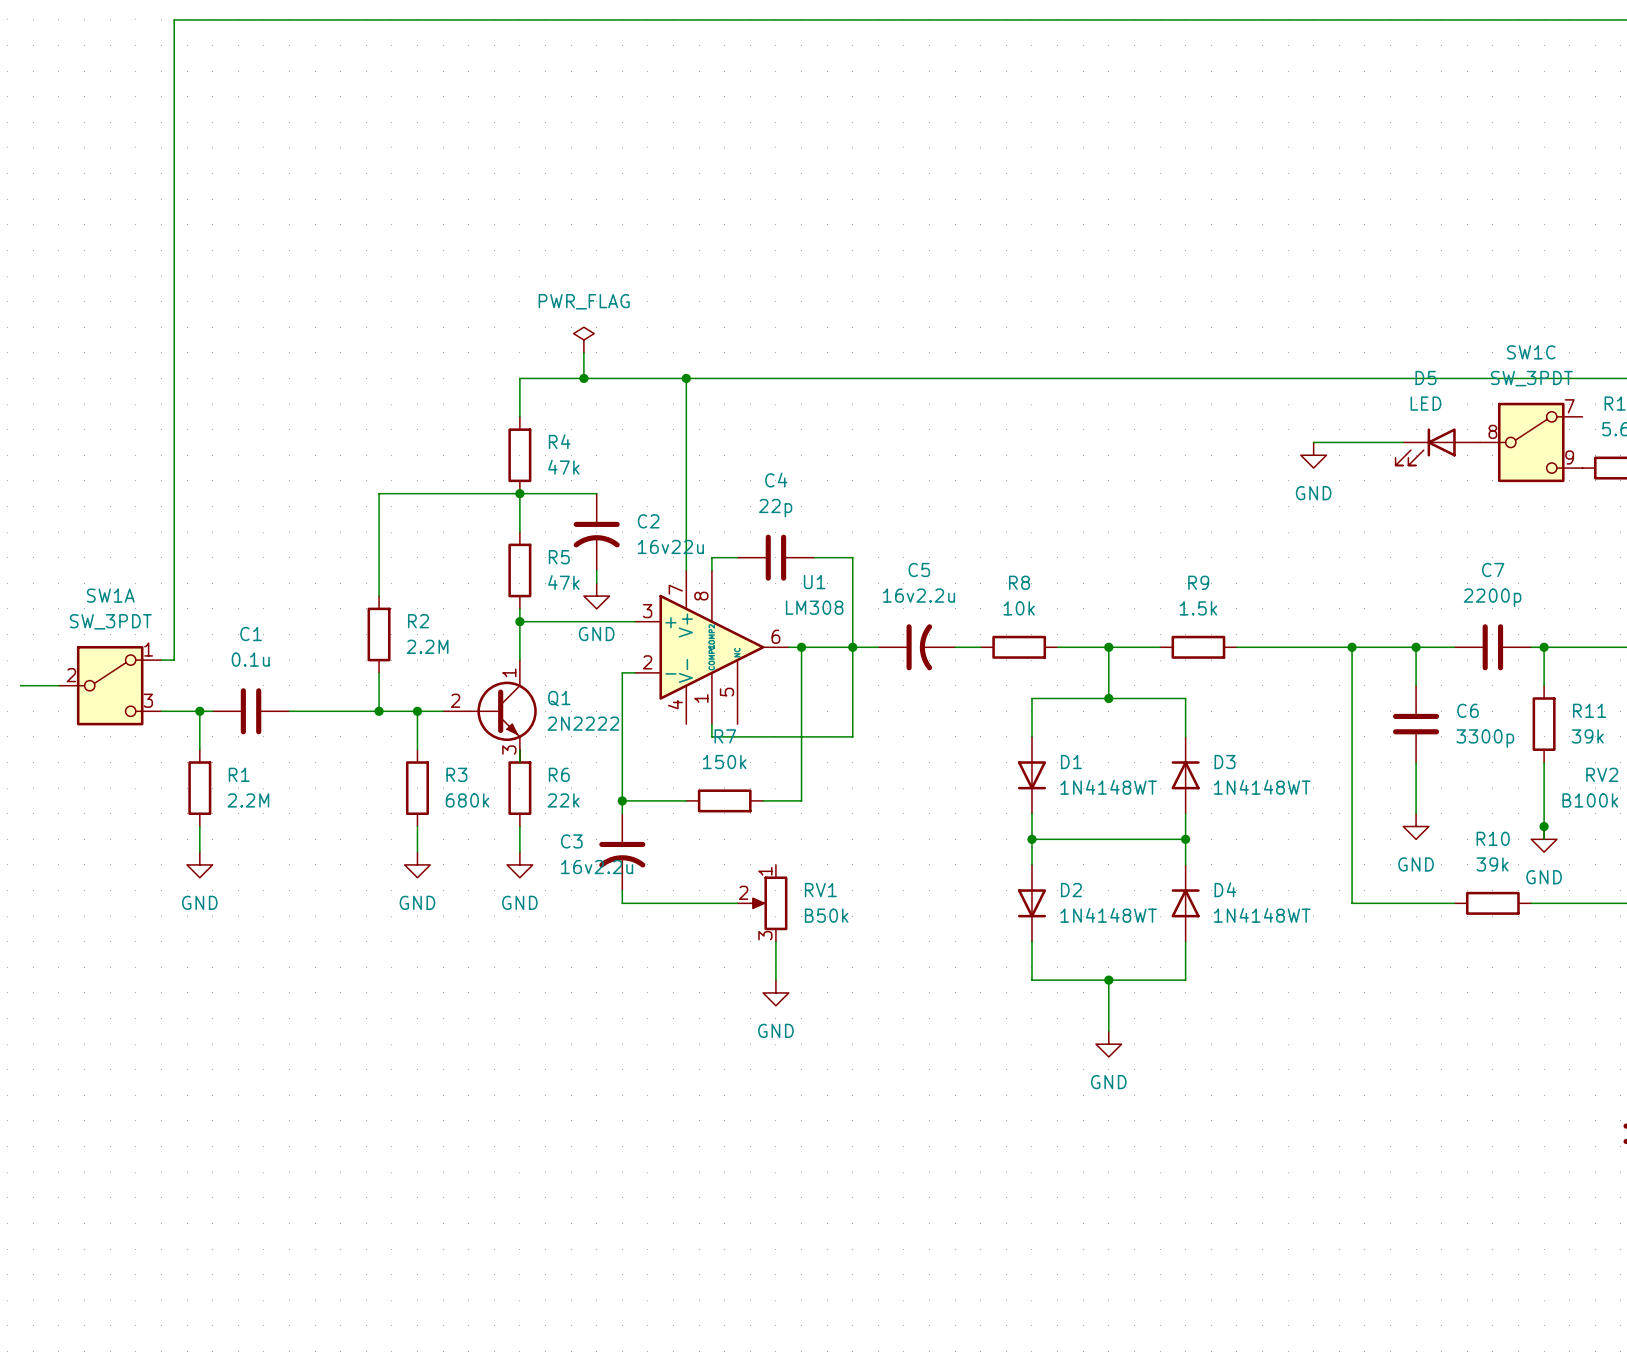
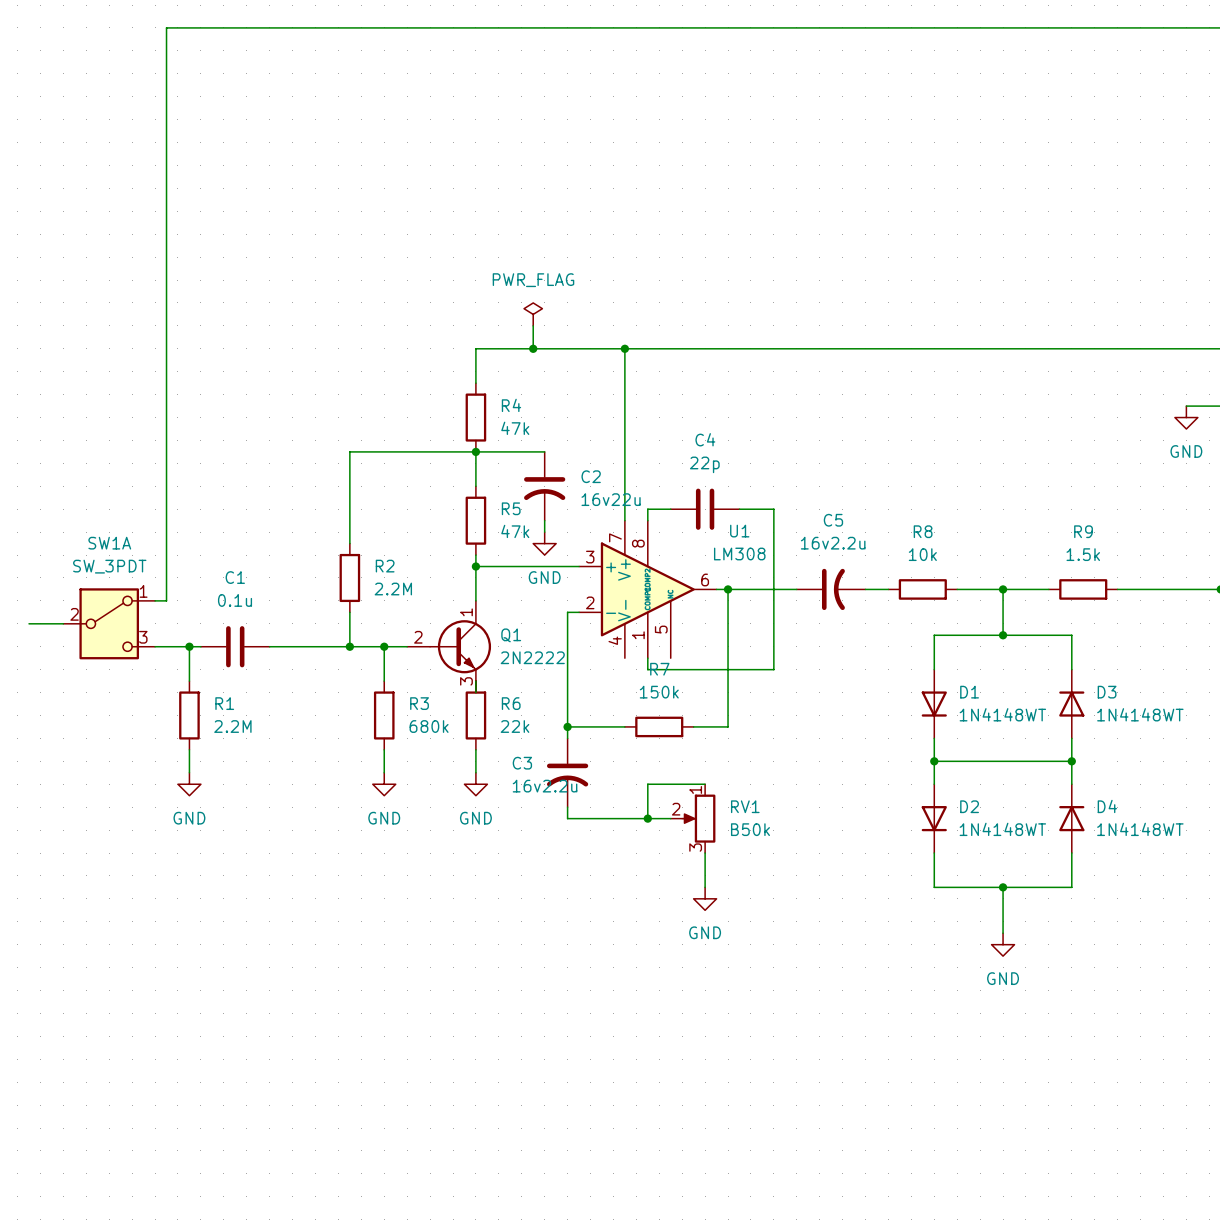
junction: (852, 647) -> none
wire: none -> (705, 784) (647, 784) (647, 818)
junction: none -> (647, 818)

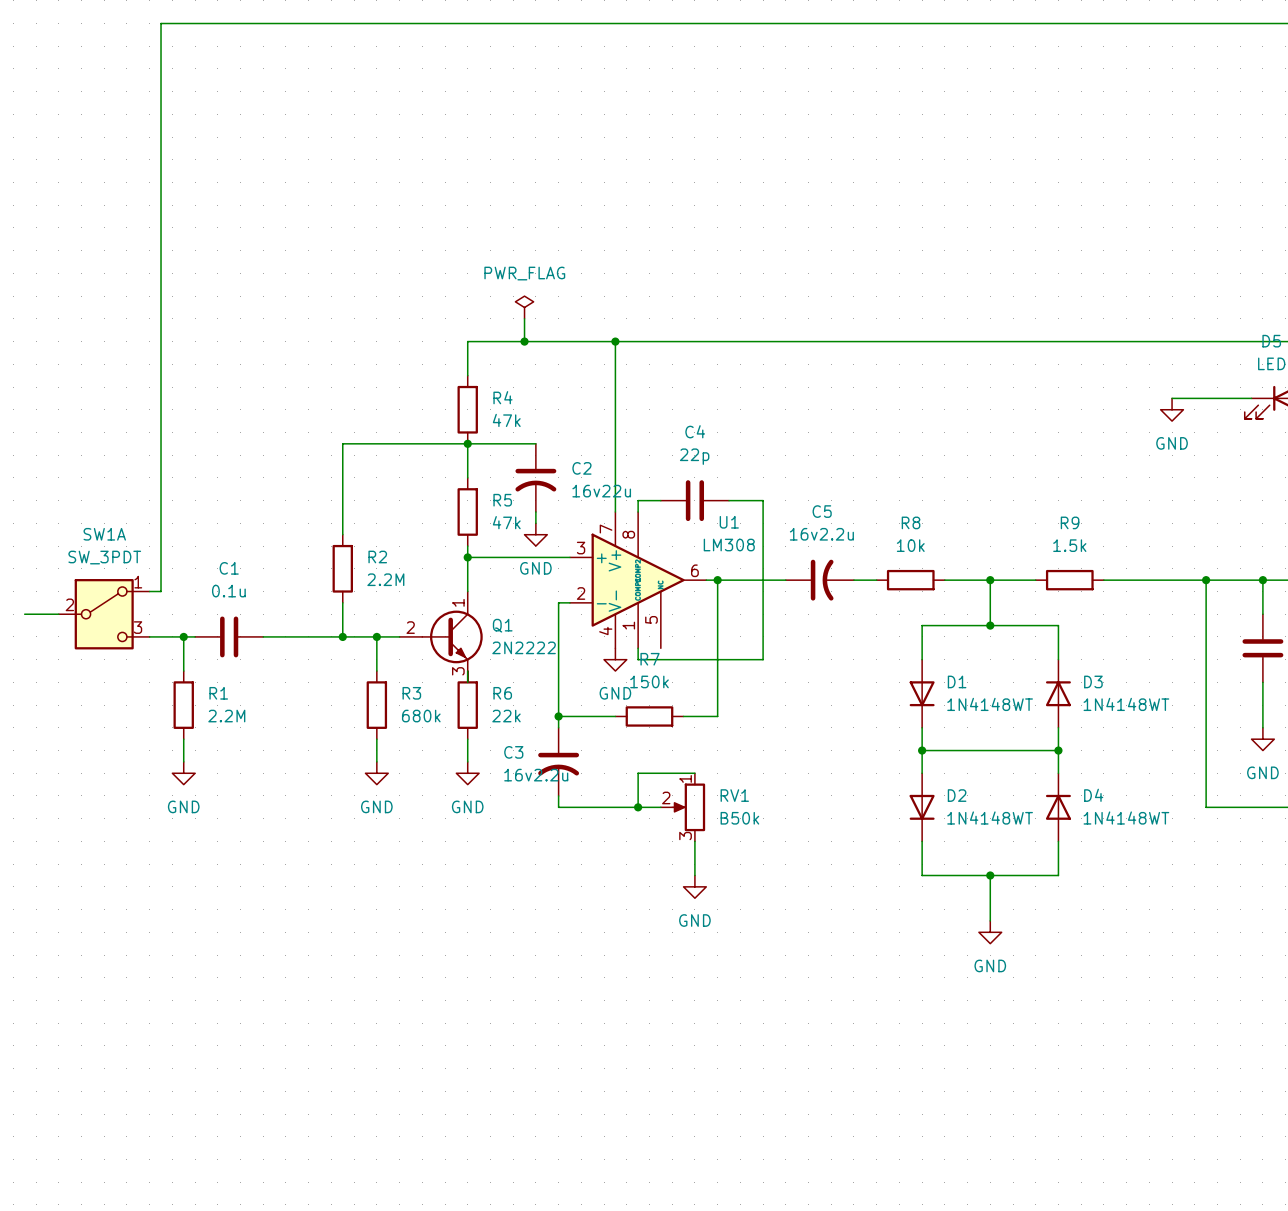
power symbol: none -> GND (615, 659)

